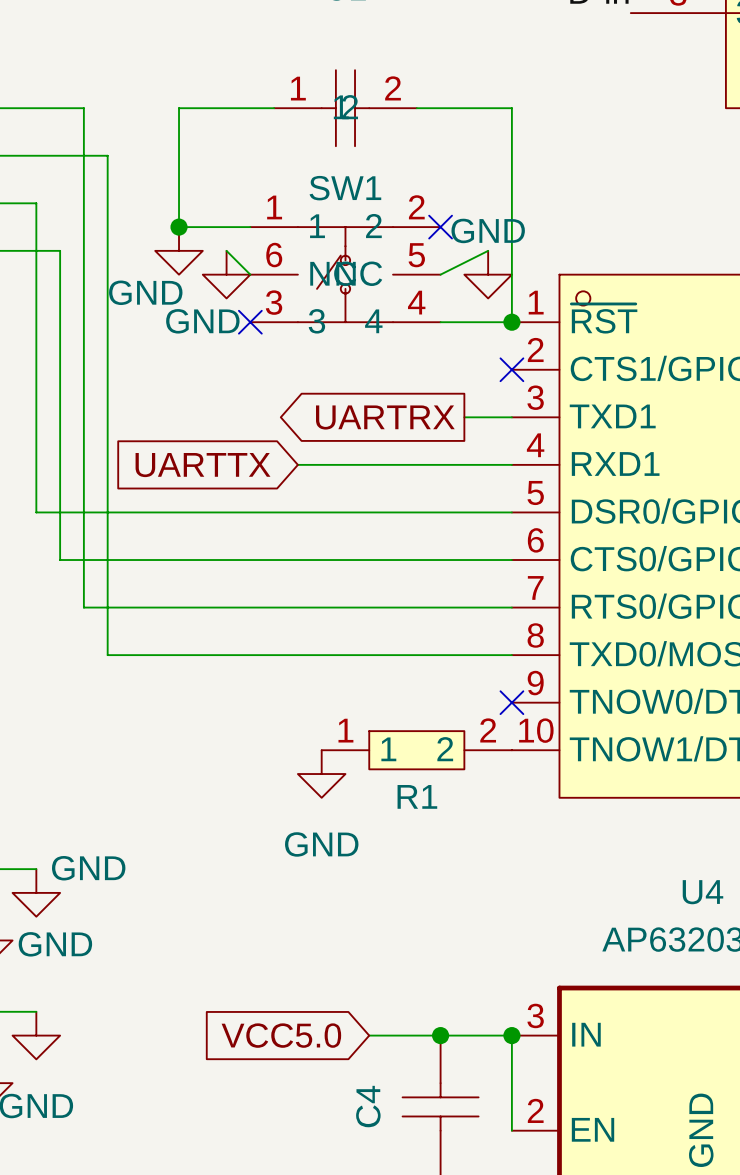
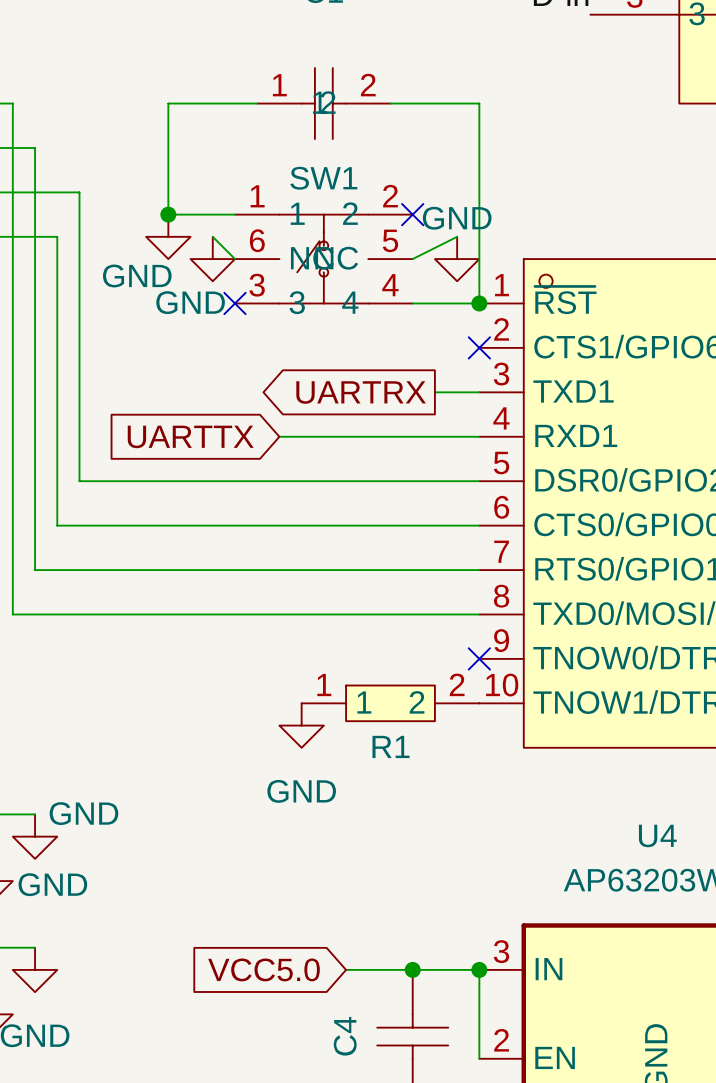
wire: (12, 108) (83, 108) (83, 203) -> (35, 147) (35, 192) (79, 192)
wire: (36, 155) (107, 155) (107, 655) -> (12, 103) (12, 614) (101, 614)
wire: (36, 512) (83, 512) (83, 607) -> (35, 481) (35, 570) (79, 570)

